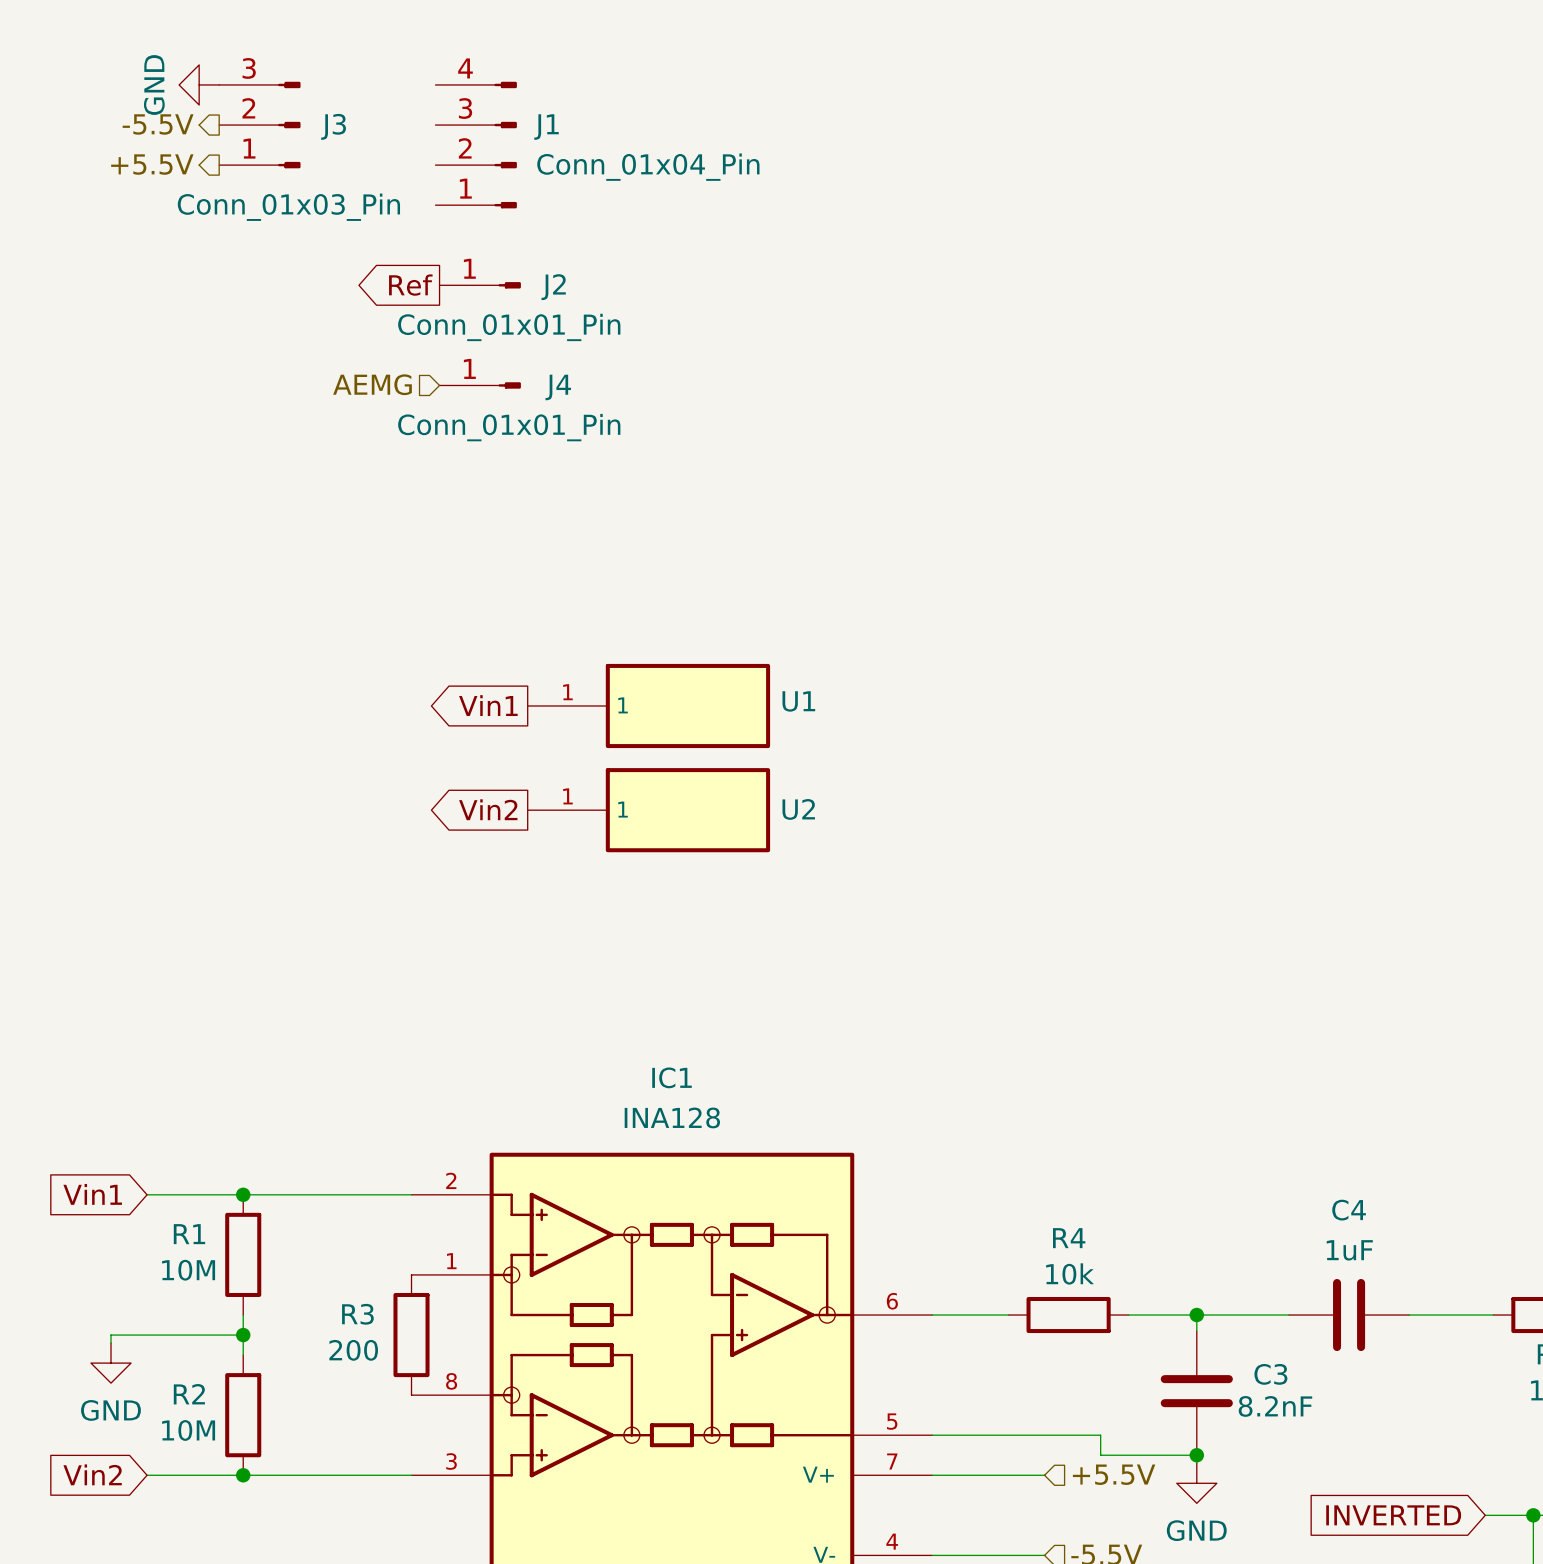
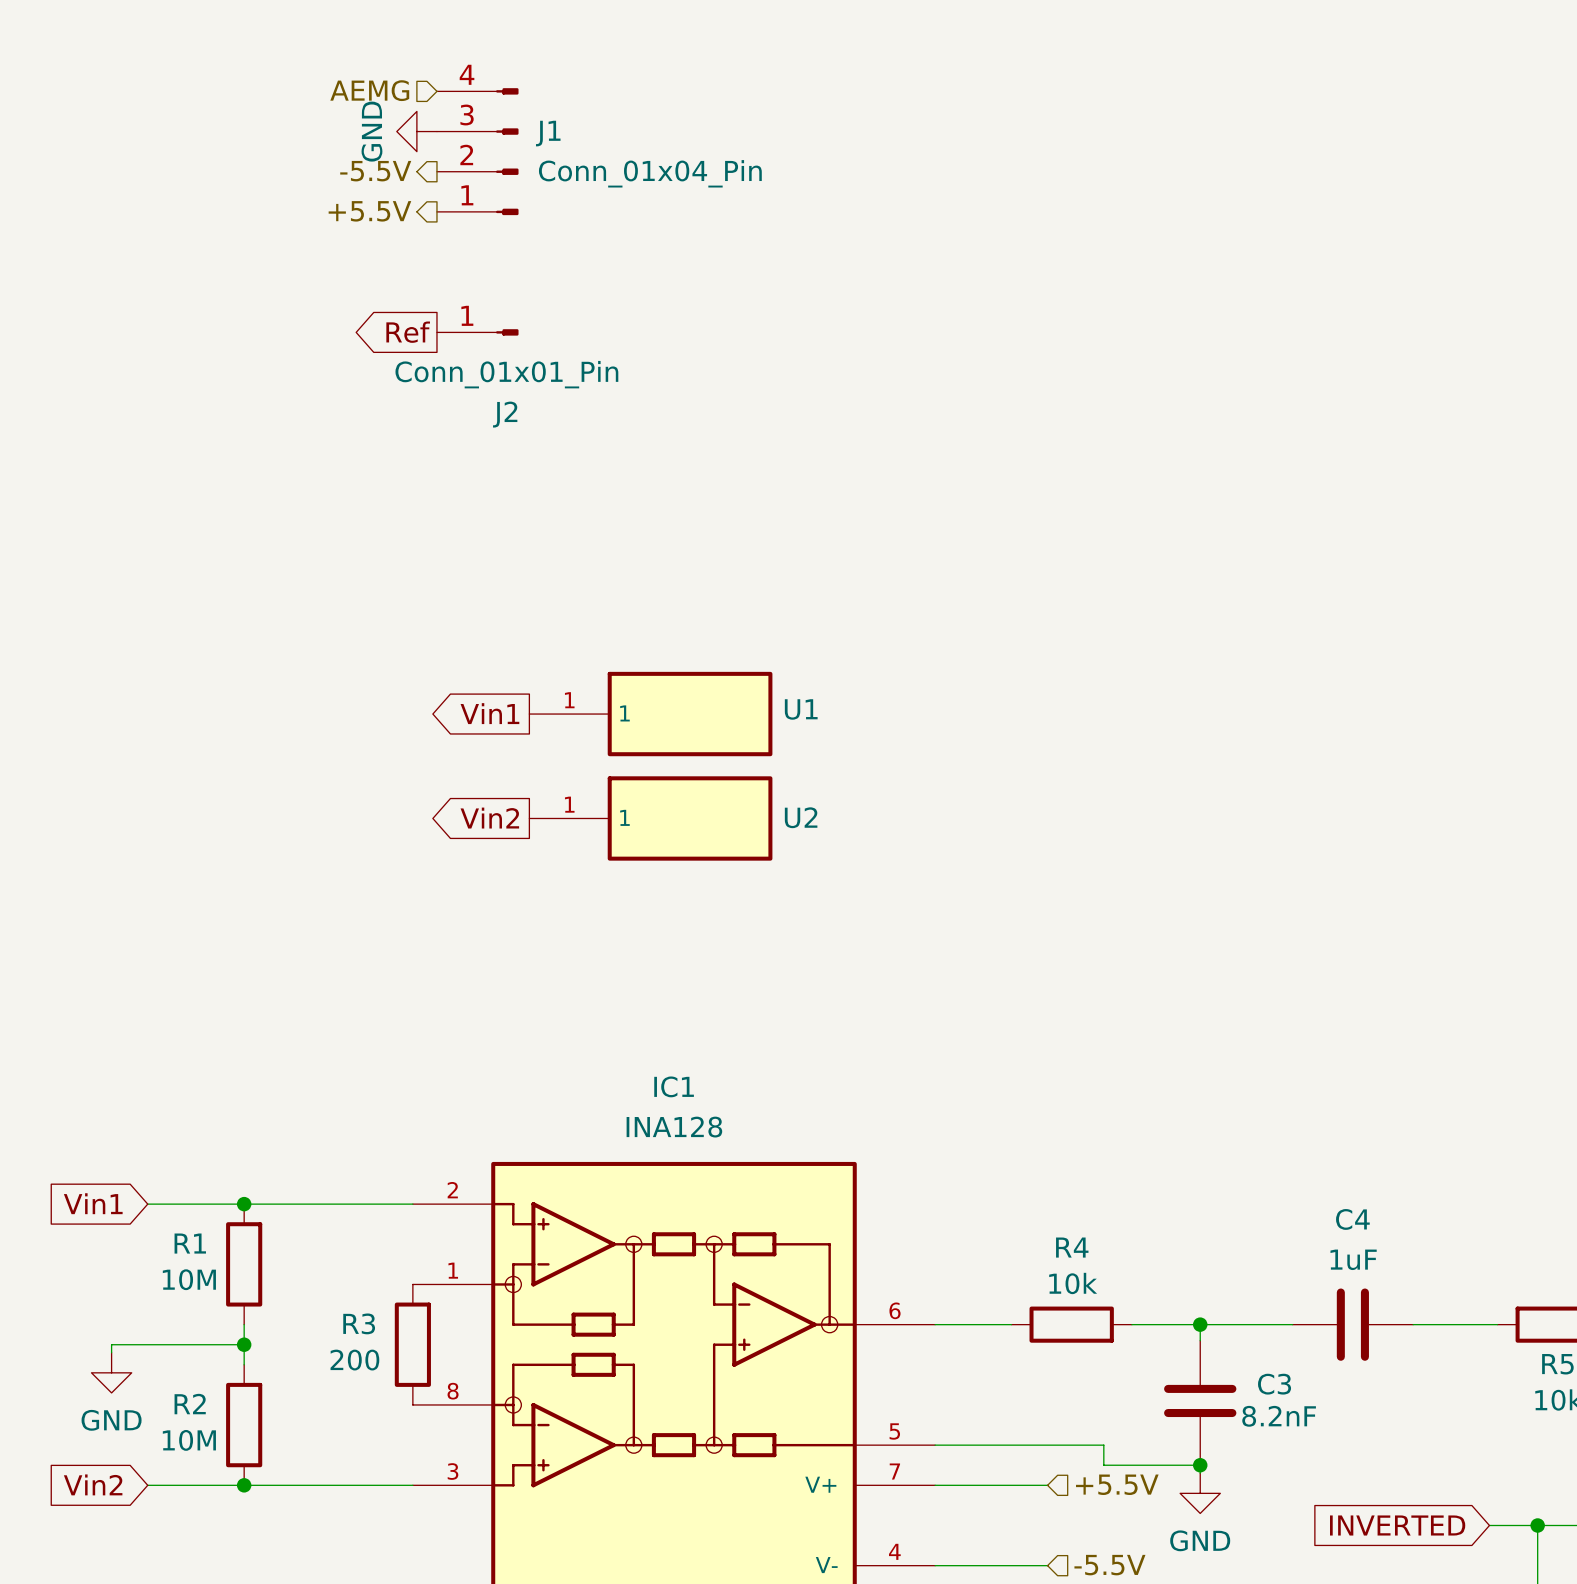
power symbol position: GND (199, 84) -> GND (416, 131)
hierarchical label position: -5.5V (158, 124) -> -5.5V (375, 171)
J3: Conn_01x03_Pin (259, 125) -> none
hierarchical label position: +5.5V (152, 164) -> +5.5V (369, 211)
global label position: Ref (410, 285) -> Ref (408, 332)
J2 position: (480, 285) -> (477, 332)
J2 name position: J2 (553, 287) -> J2 (505, 414)
hierarchical label position: AEMG (372, 384) -> AEMG (369, 90)
J4: Conn_01x01_Pin (480, 385) -> none

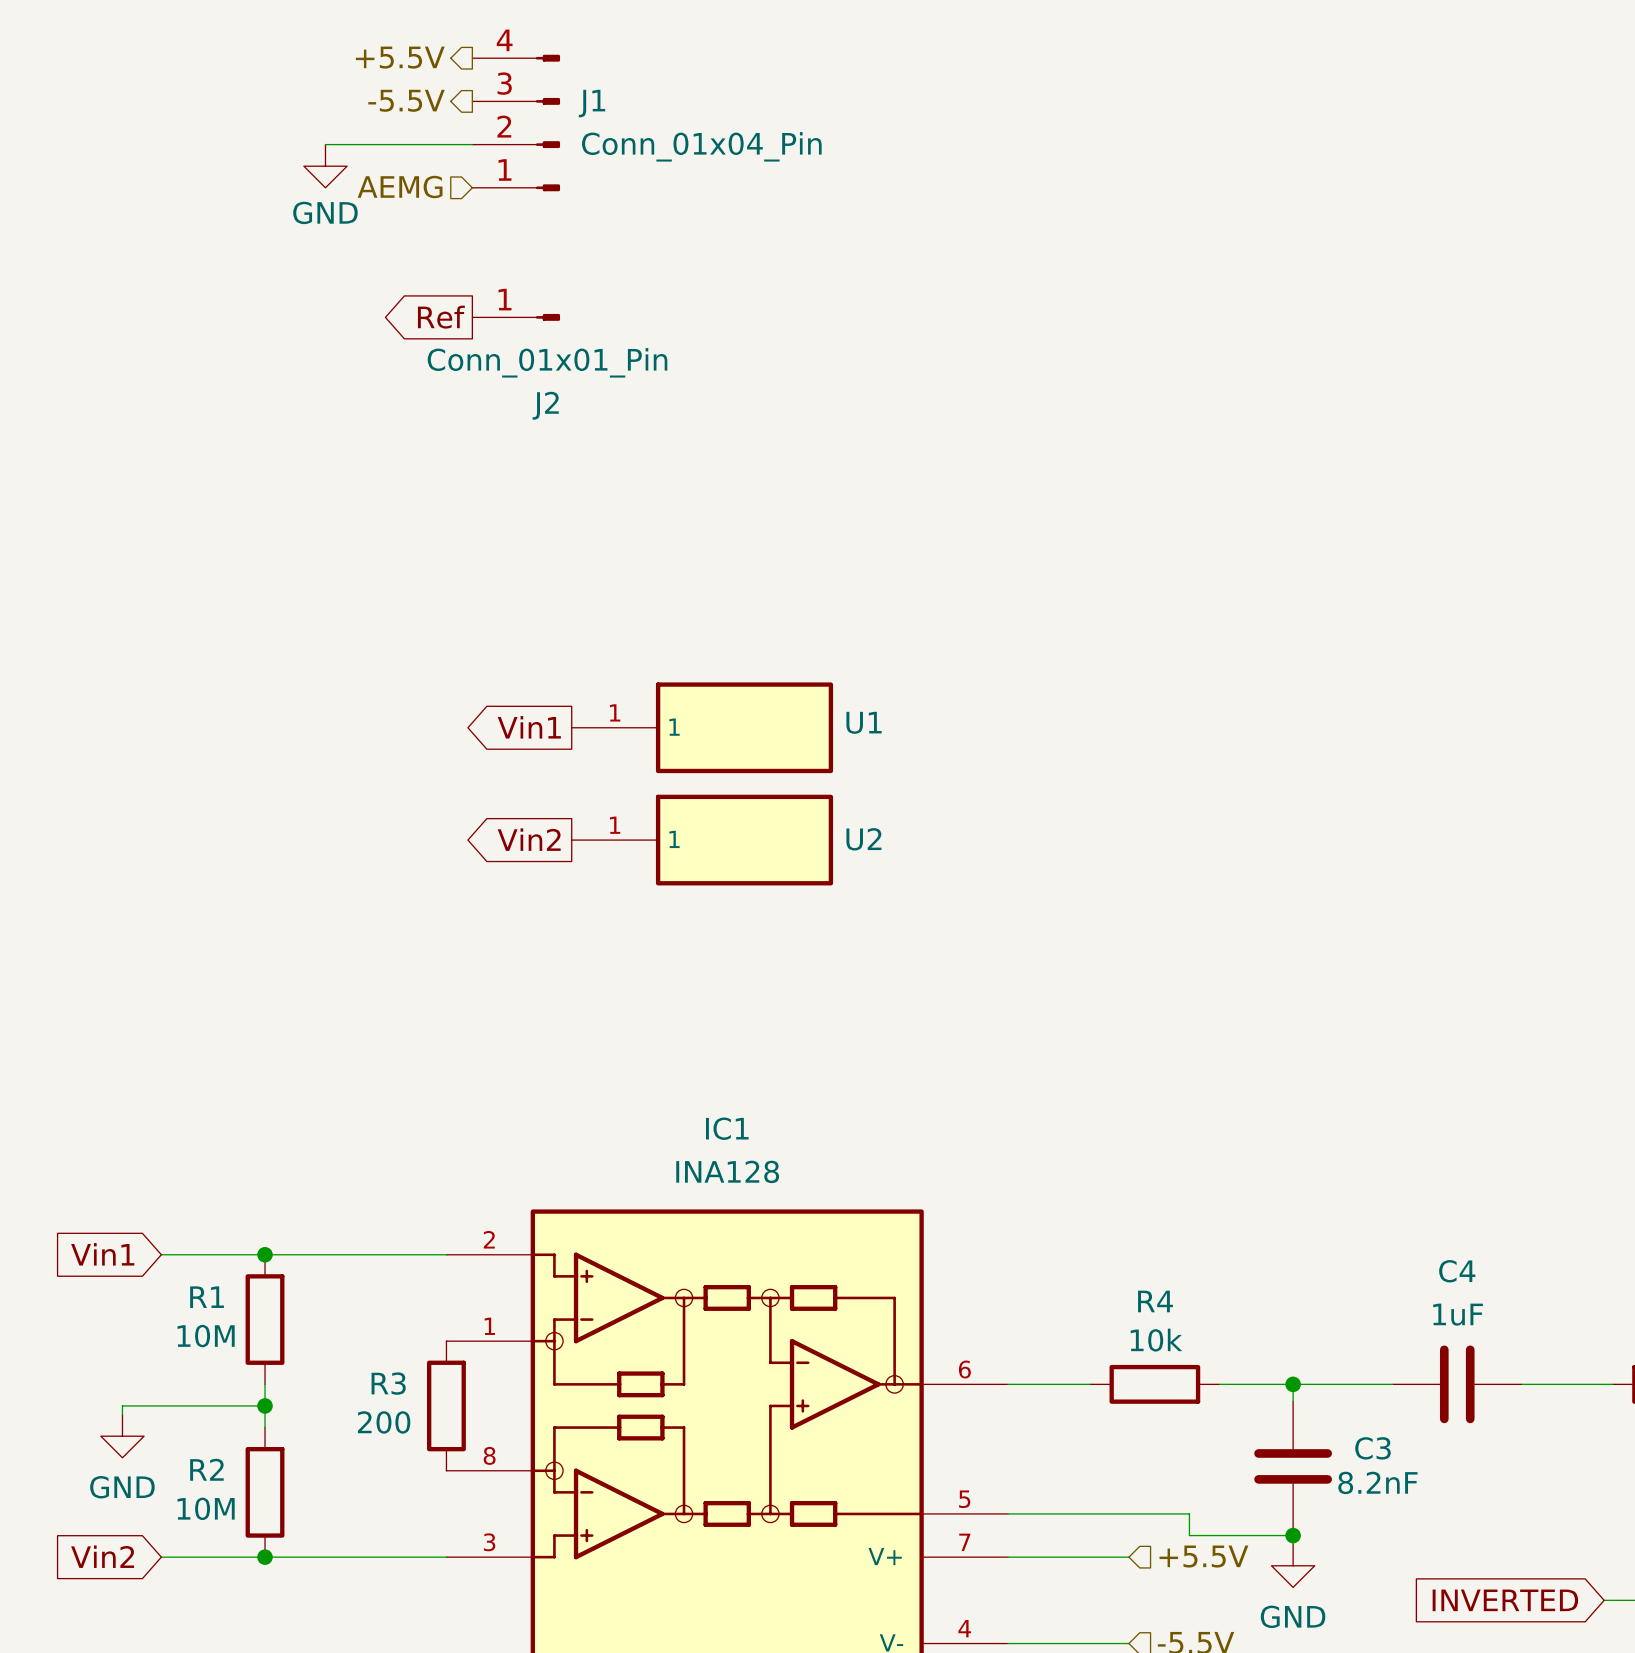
hierarchical label shape: input (369, 90) -> output (400, 57)
hierarchical label: AEMG (369, 90) -> +5.5V (400, 57)
power symbol rotation: 0° (416, 131) -> 90° counterclockwise (325, 166)
power symbol position: GND (416, 131) -> GND (325, 166)
wire: none -> (325, 144) (472, 144)
hierarchical label position: -5.5V (375, 171) -> -5.5V (406, 100)
hierarchical label shape: output (369, 211) -> input (400, 187)
hierarchical label: +5.5V (369, 211) -> AEMG (400, 187)

